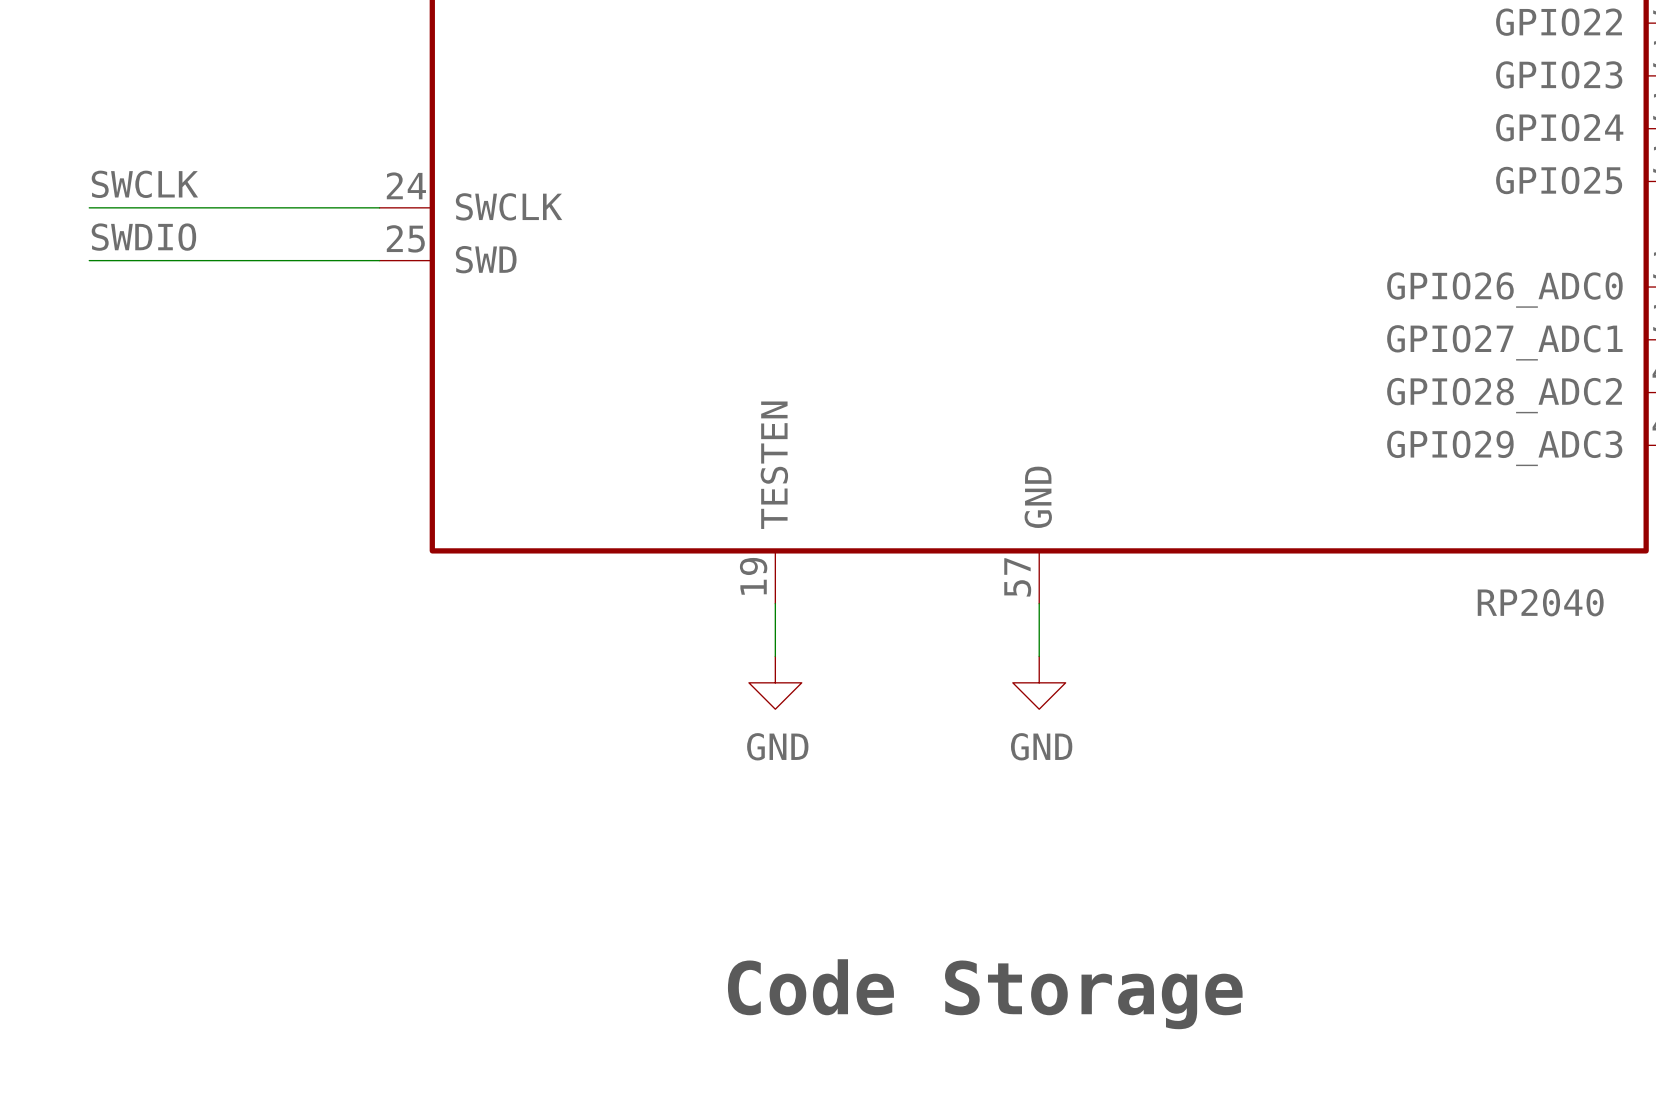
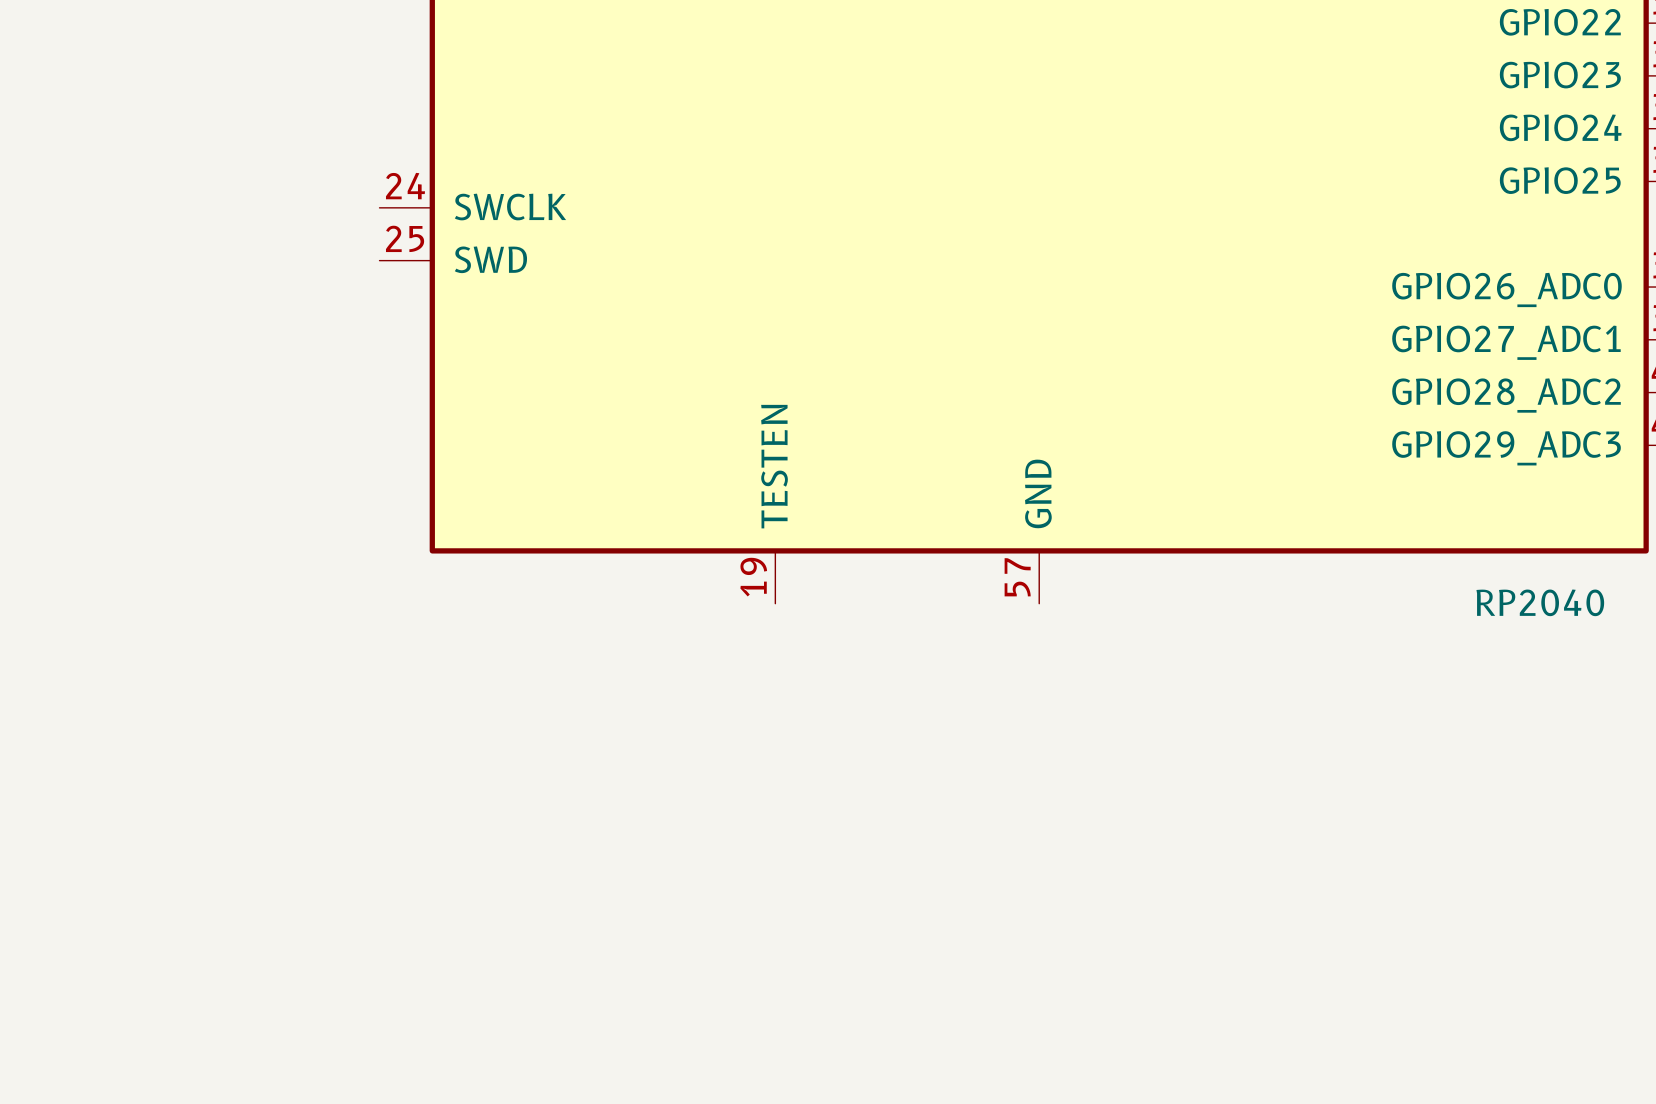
label: SWCLK (144, 184) -> none
wire: (89, 207) (379, 207) -> none
label: SWDIO (143, 237) -> none
wire: (89, 260) (379, 260) -> none
wire: (775, 603) (775, 656) -> none
wire: (1039, 603) (1039, 656) -> none
power symbol: GND (775, 682) -> none
power symbol: GND (1039, 682) -> none
text: Code Storage (985, 994) -> none

